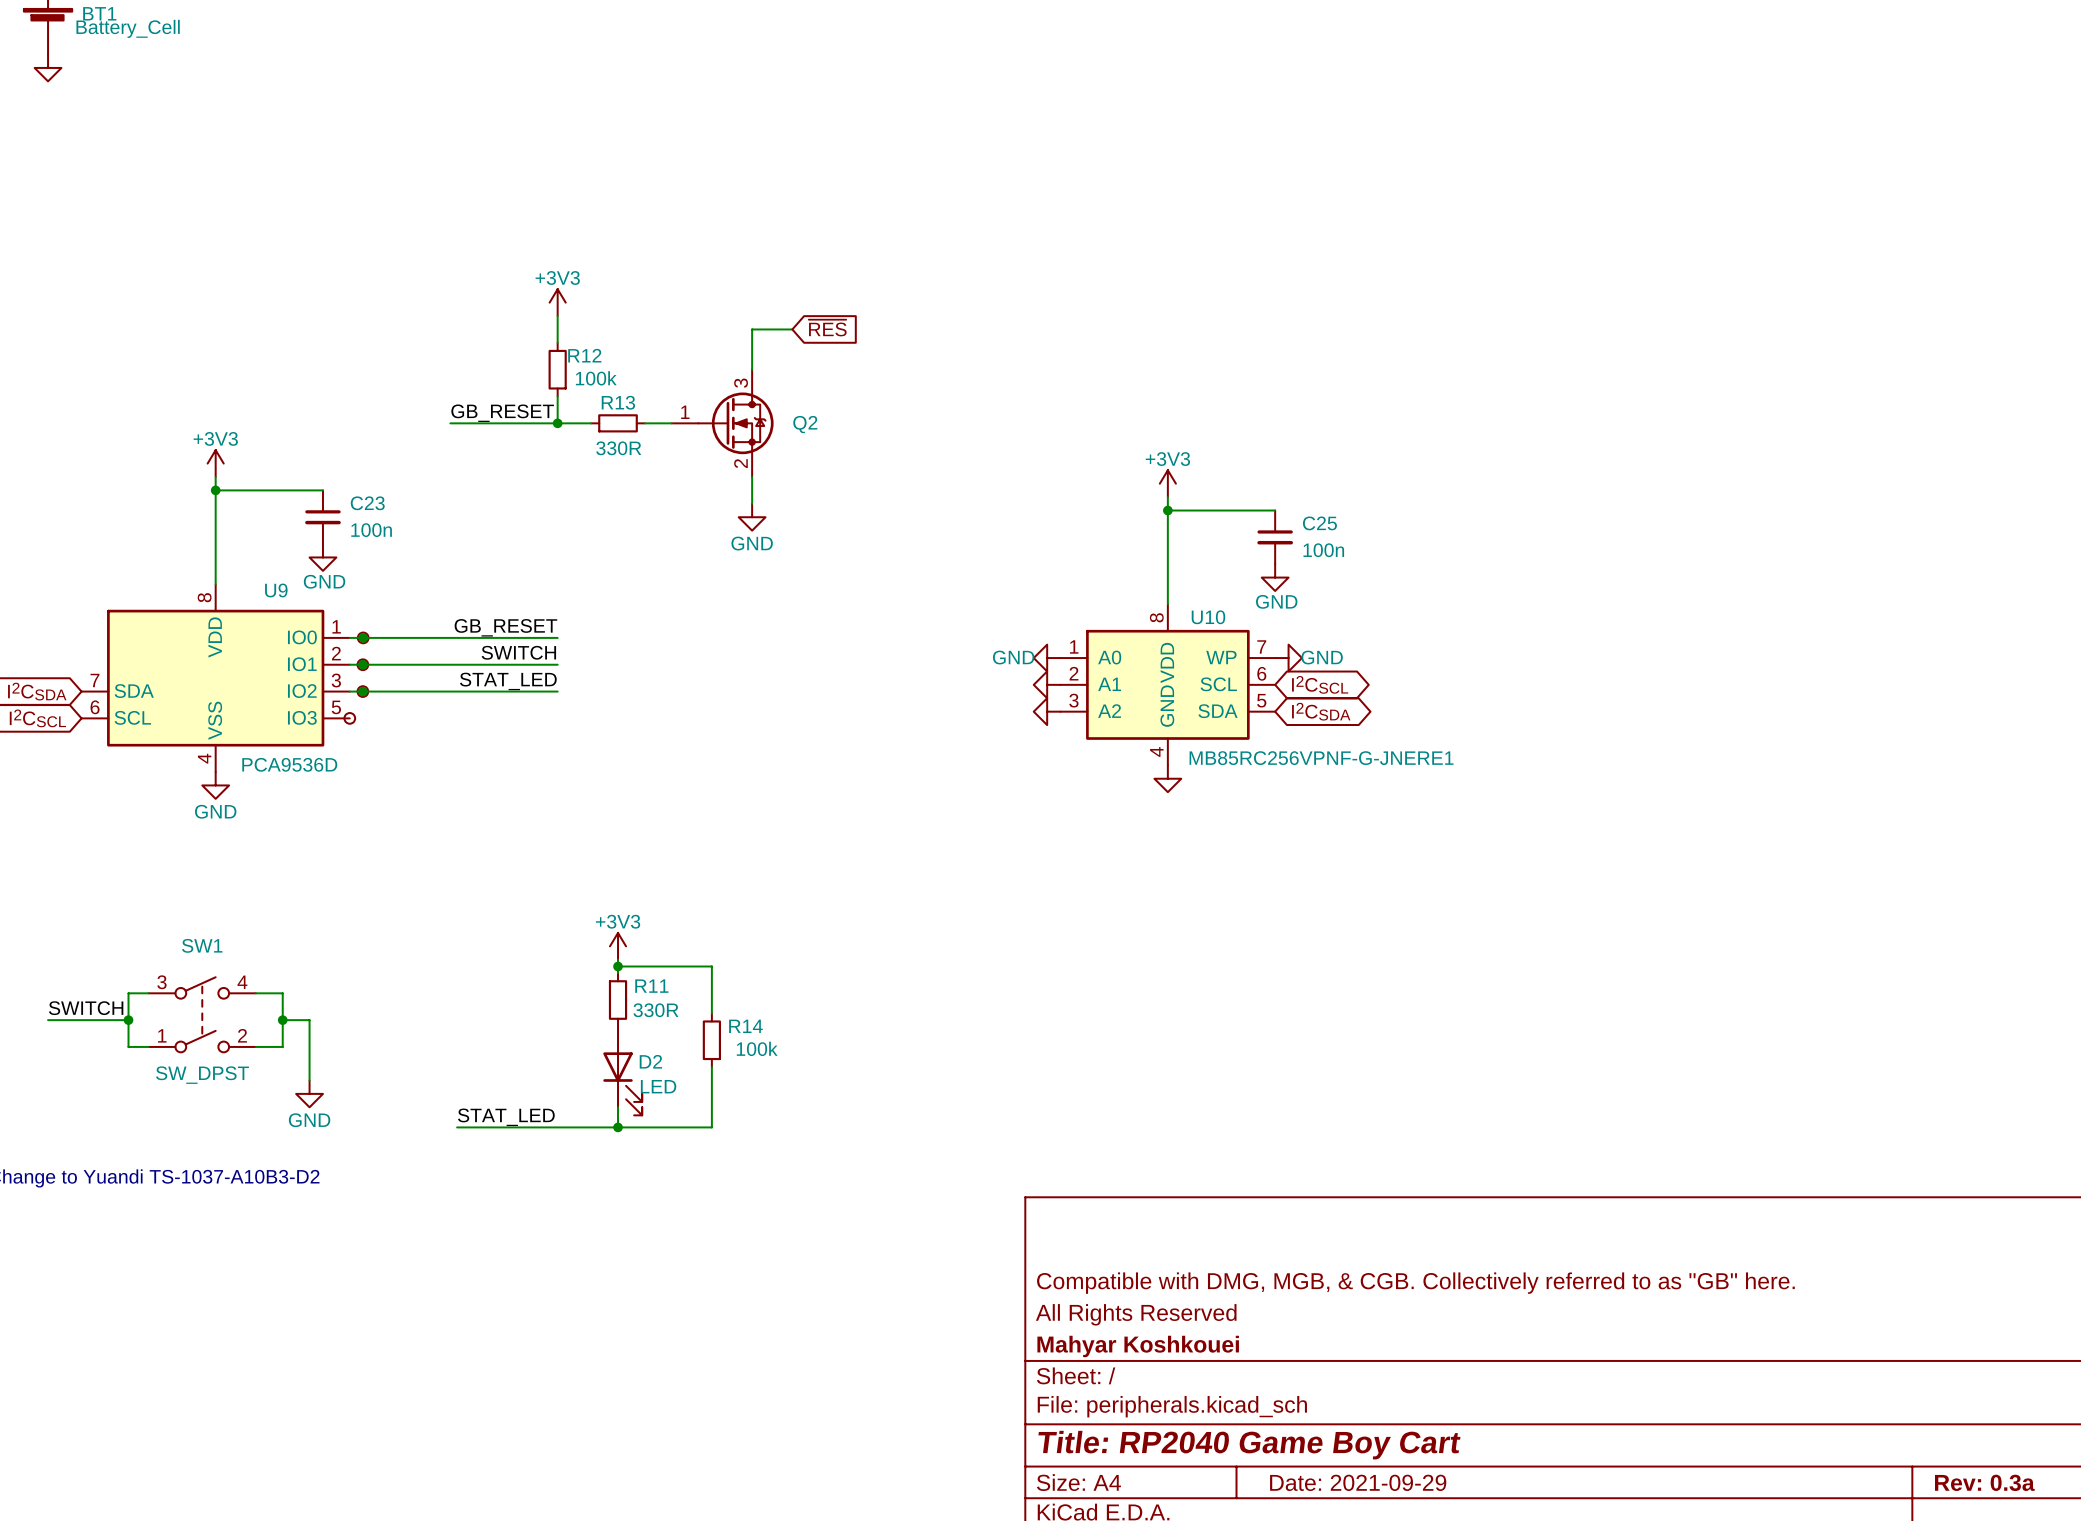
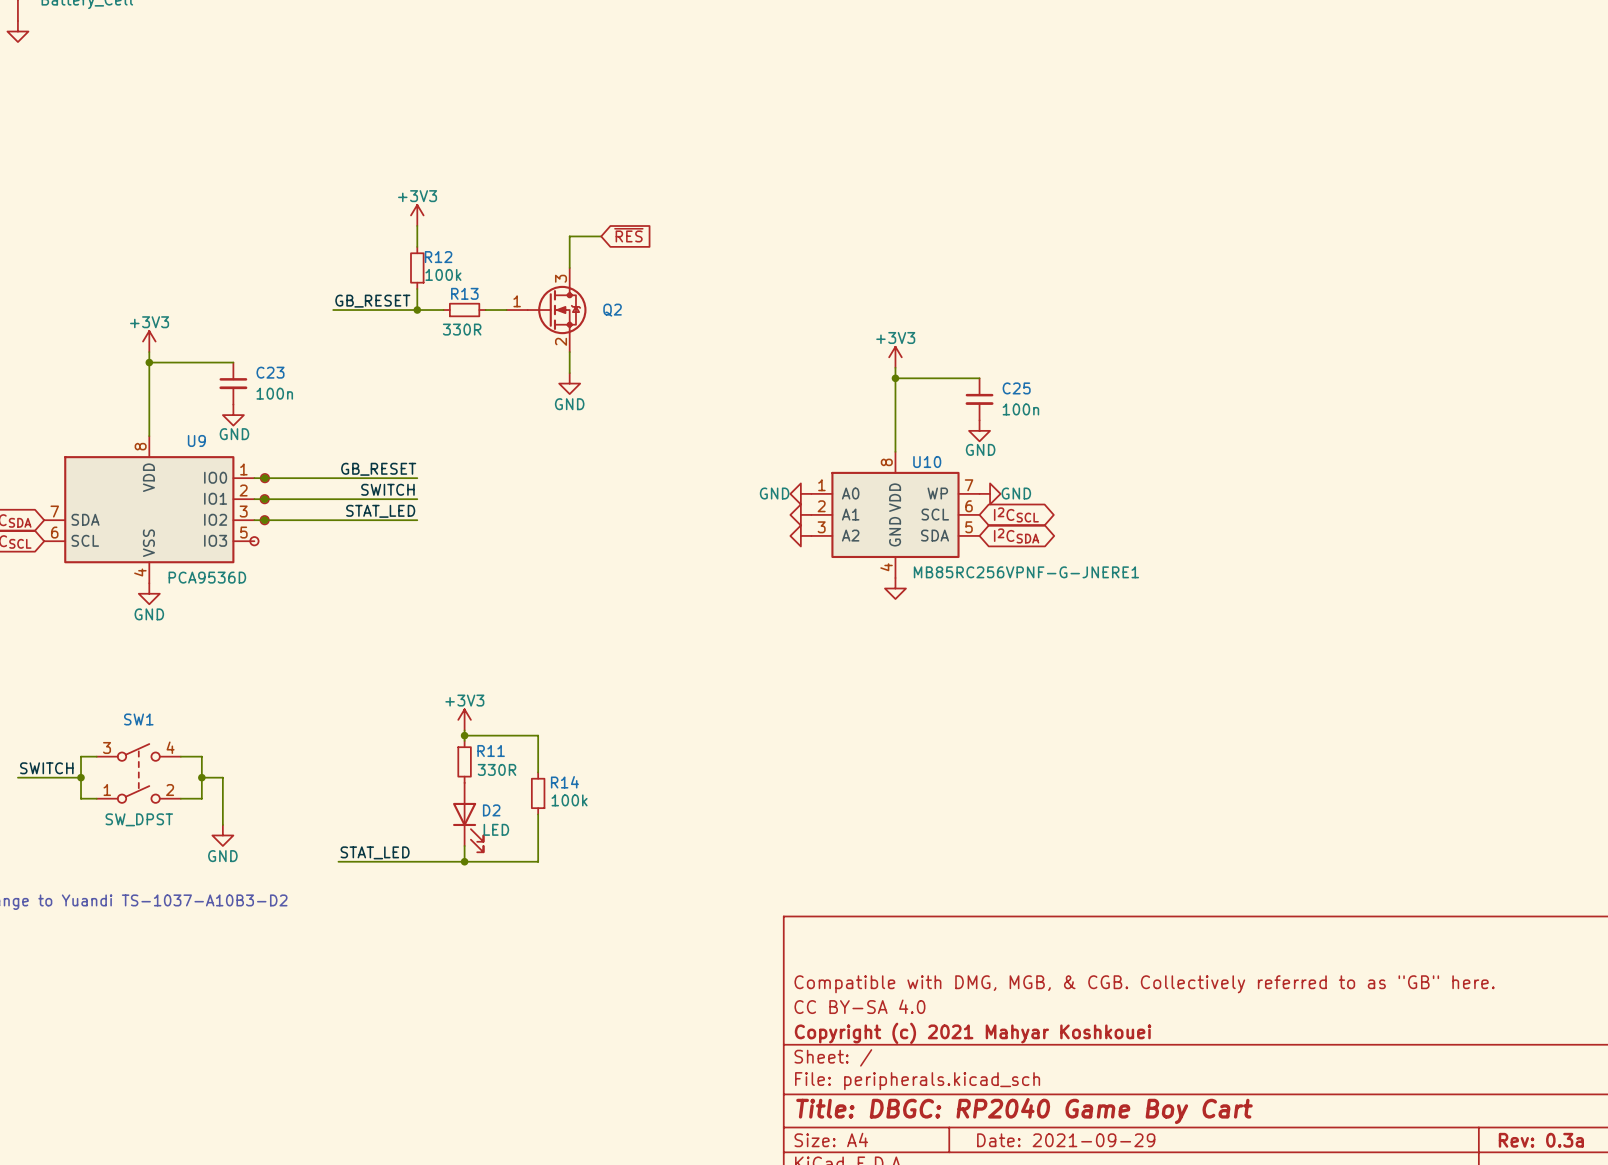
title block: All Rights Reserved (1136, 1314) -> CC BY-SA 4.0 (859, 1006)
title block: Mahyar Koshkouei (1138, 1346) -> Copyright (c) 2021 Mahyar Koshkouei (973, 1033)
title block: Title: RP2040 Game Boy Cart (1249, 1445) -> Title: DBGC: RP2040 Game Boy Cart (1024, 1111)

